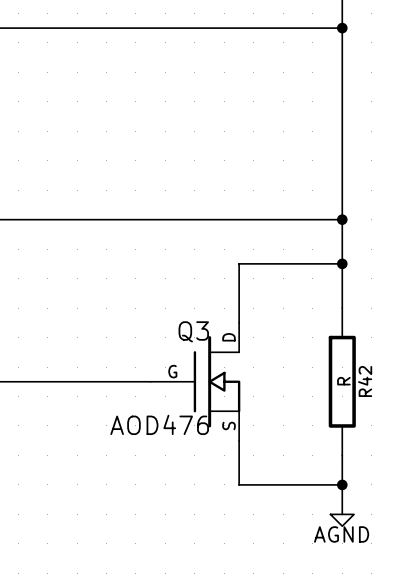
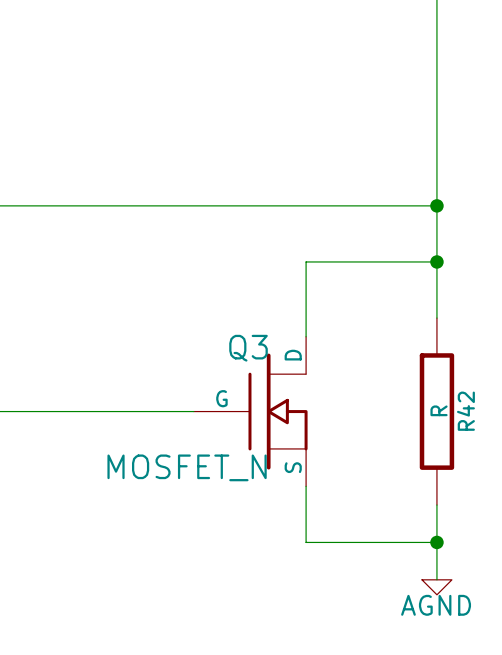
Q3 value: AOD476 (159, 424) -> MOSFET_N (187, 467)

